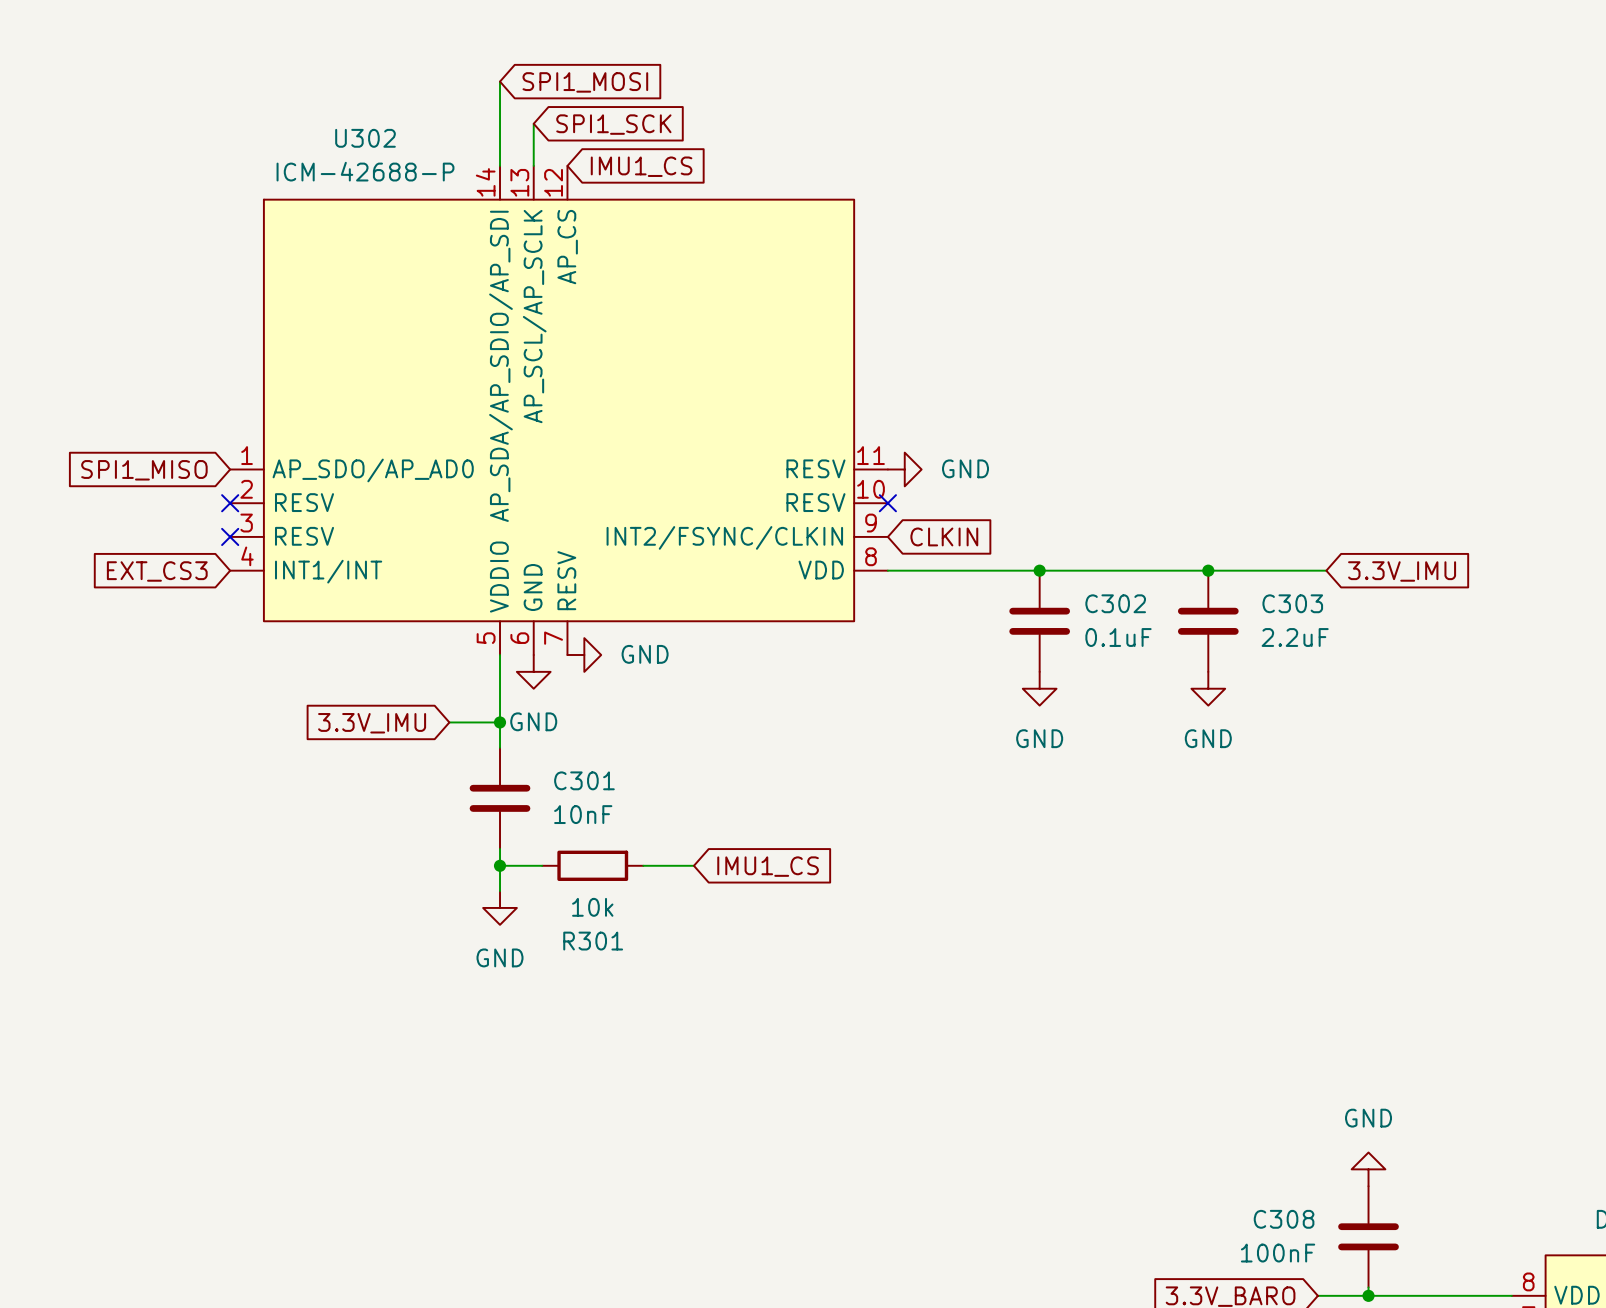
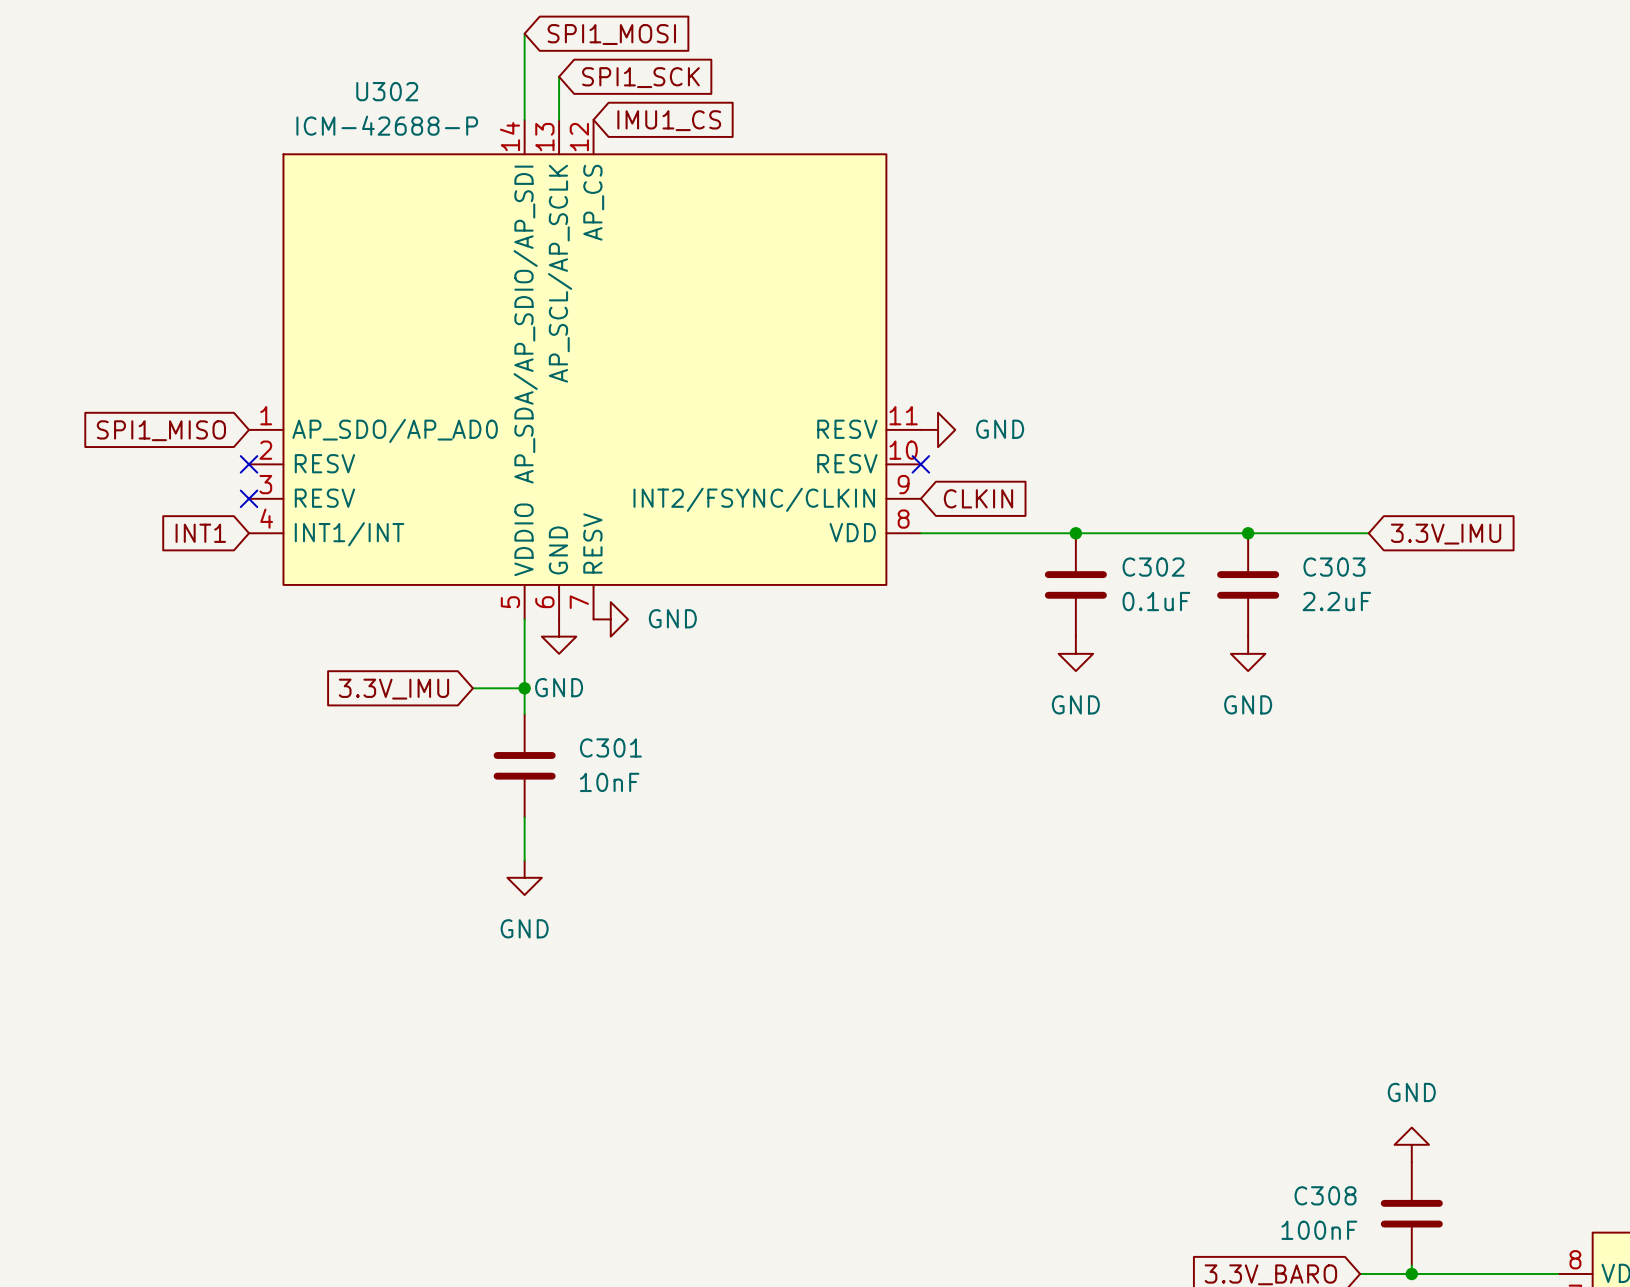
global label: EXT_CS3 (157, 571) -> INT1 (200, 533)
wire: (500, 865) (542, 865) -> none
junction: (500, 865) -> none
R301: 10k (592, 865) -> none
wire: (643, 865) (693, 865) -> none
global label: IMU1_CS (768, 866) -> none

